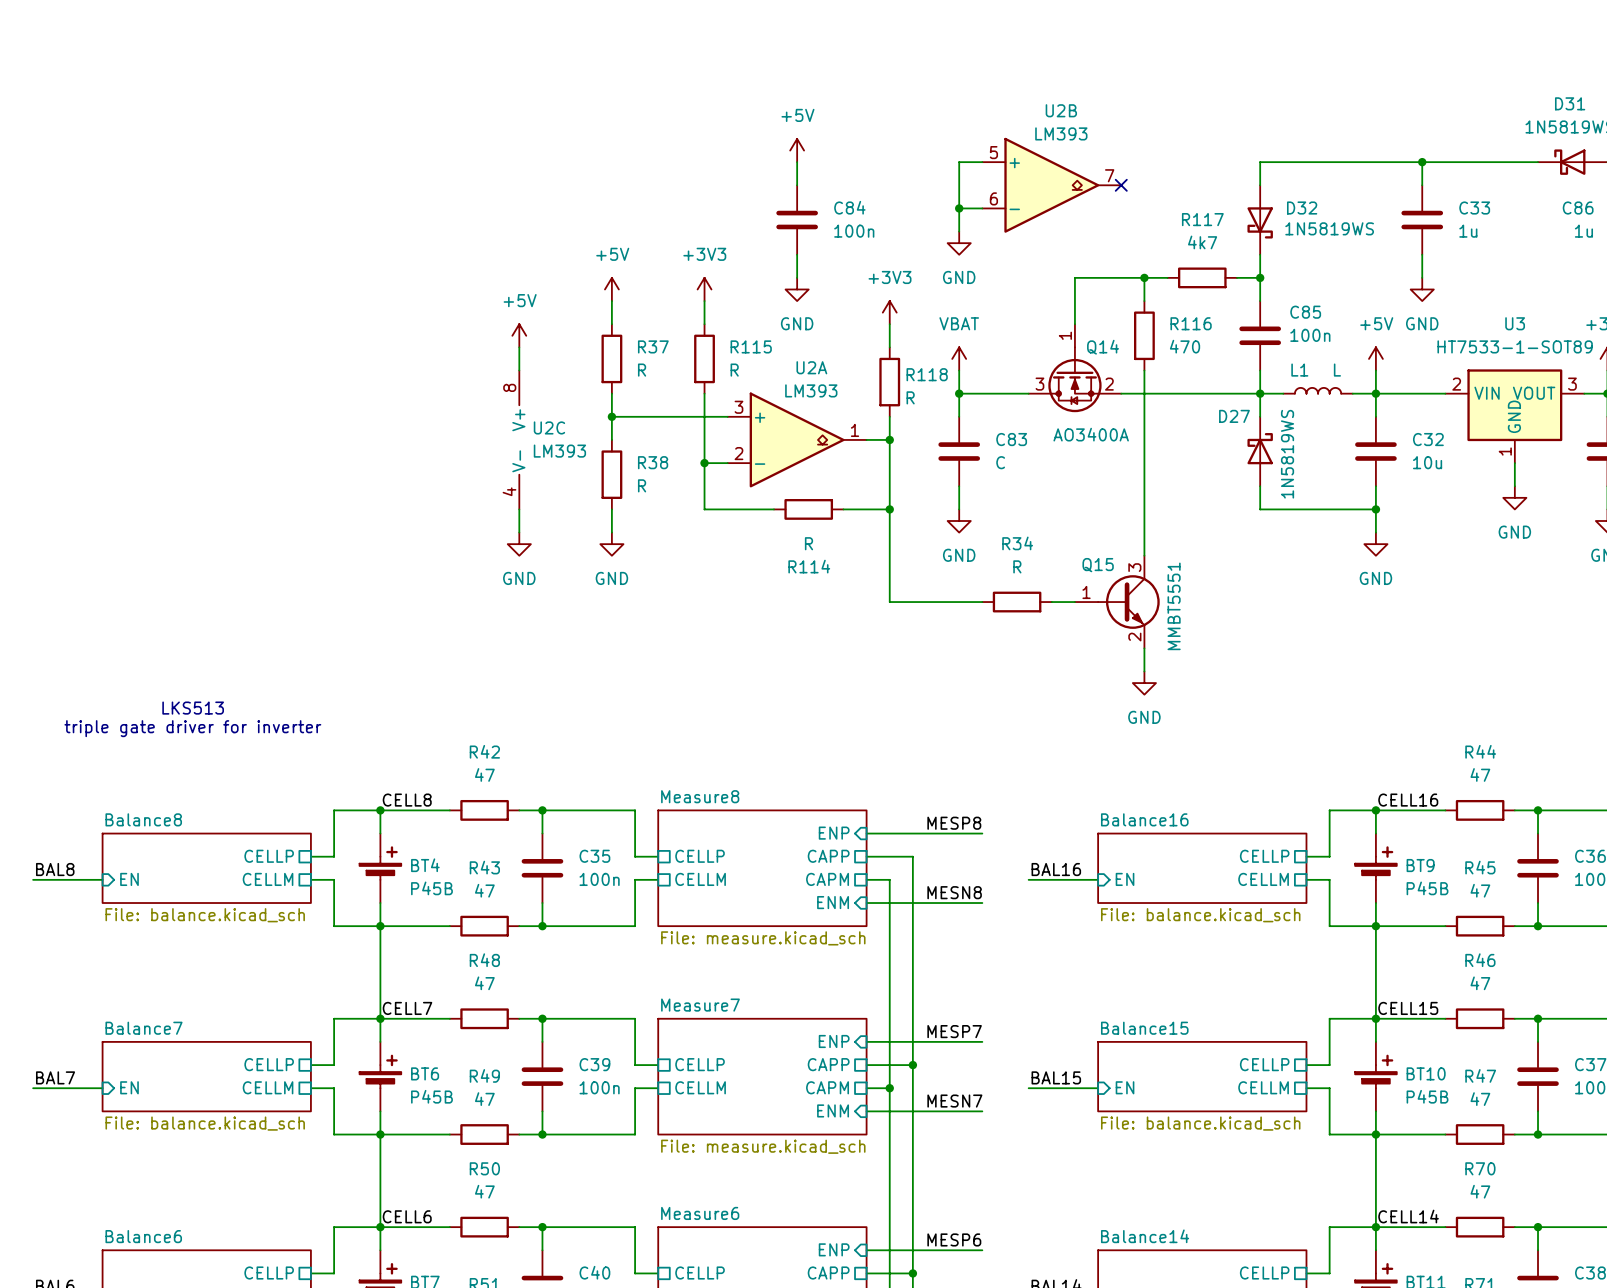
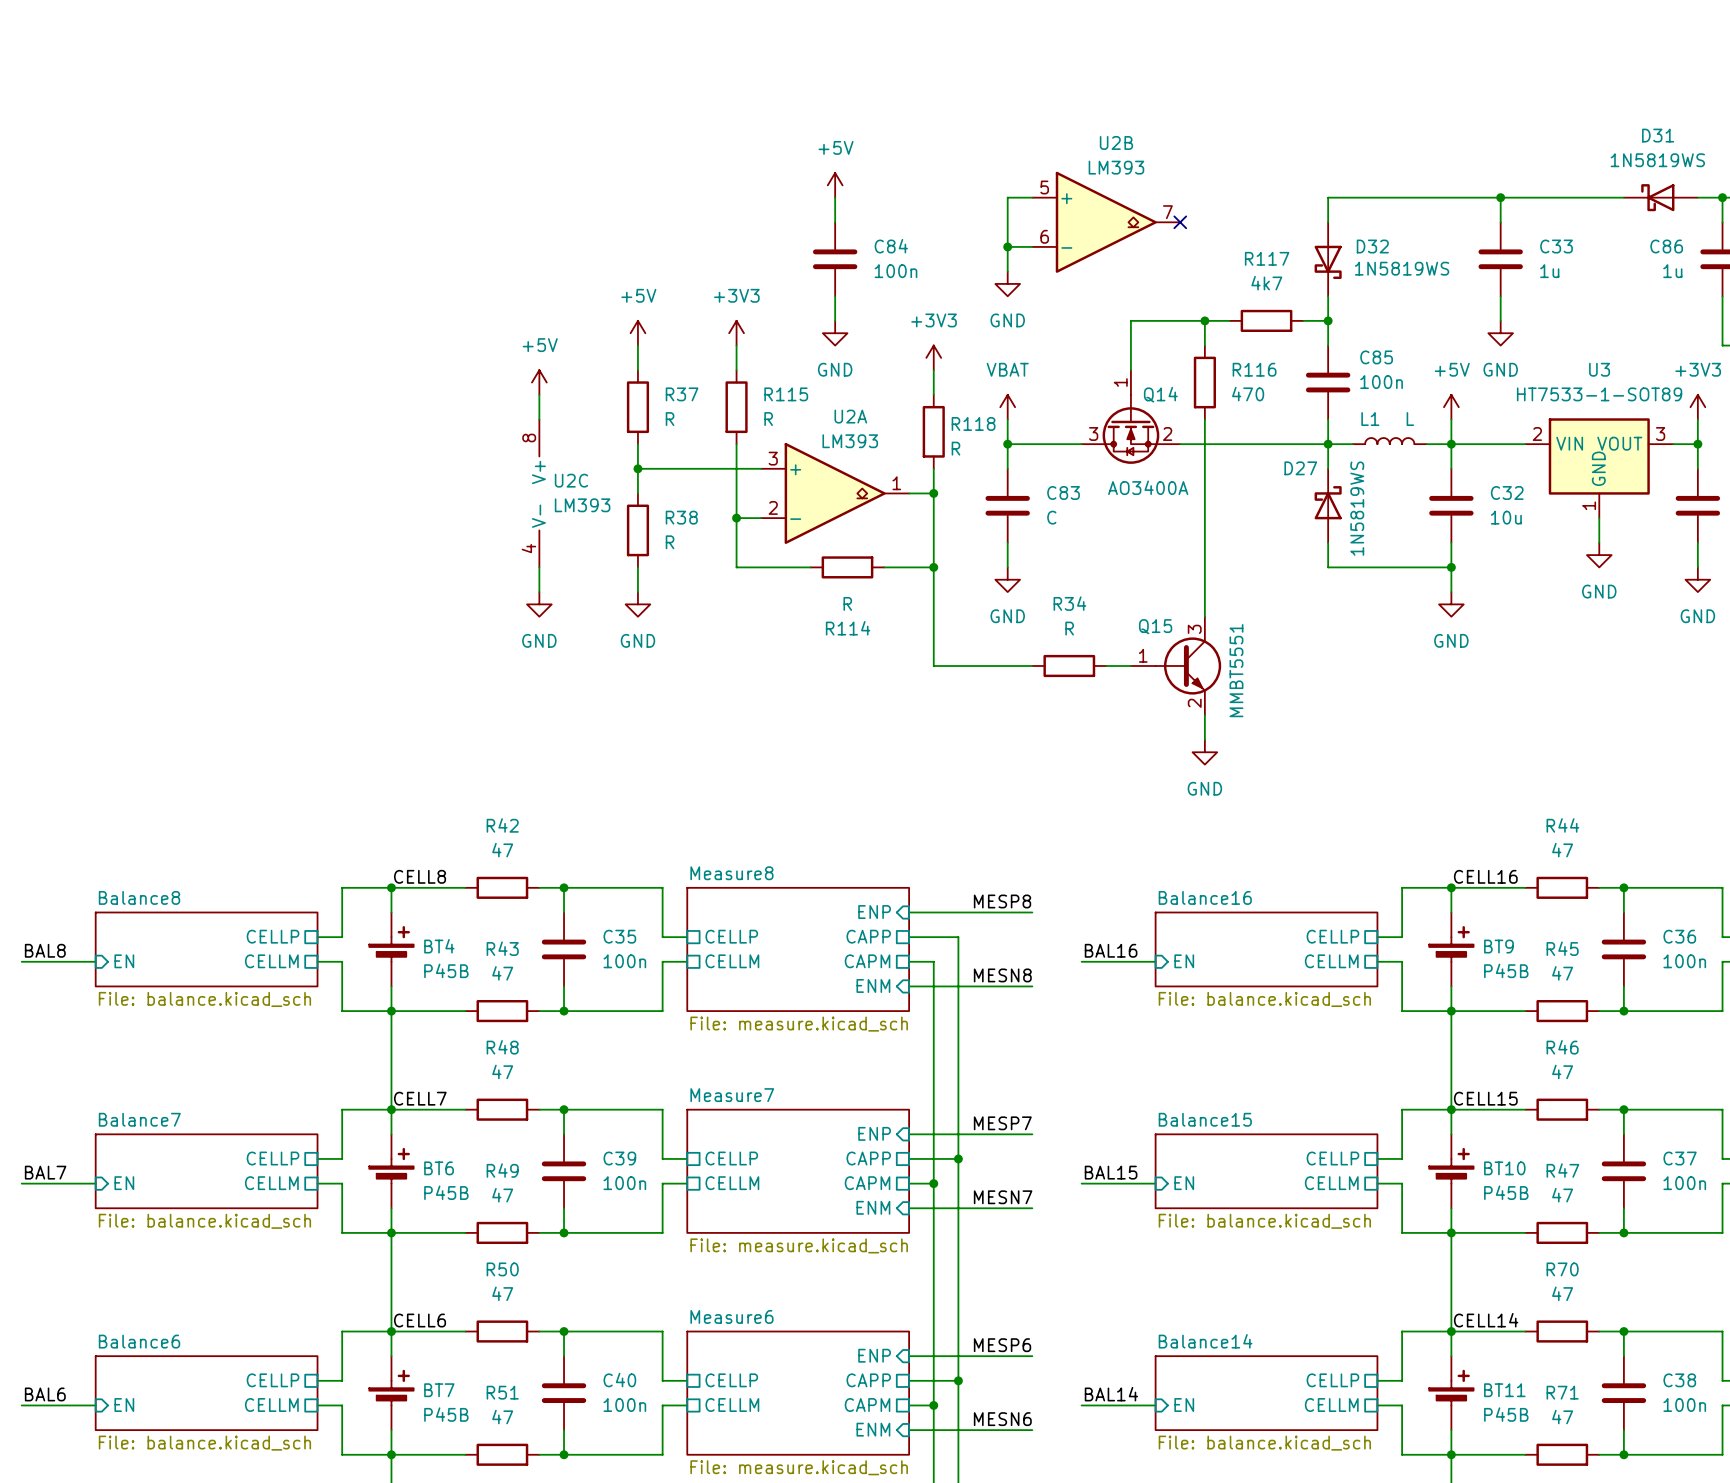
text: LKS513 (193, 708) -> none
text: triple gate driver for inverter (192, 728) -> none

